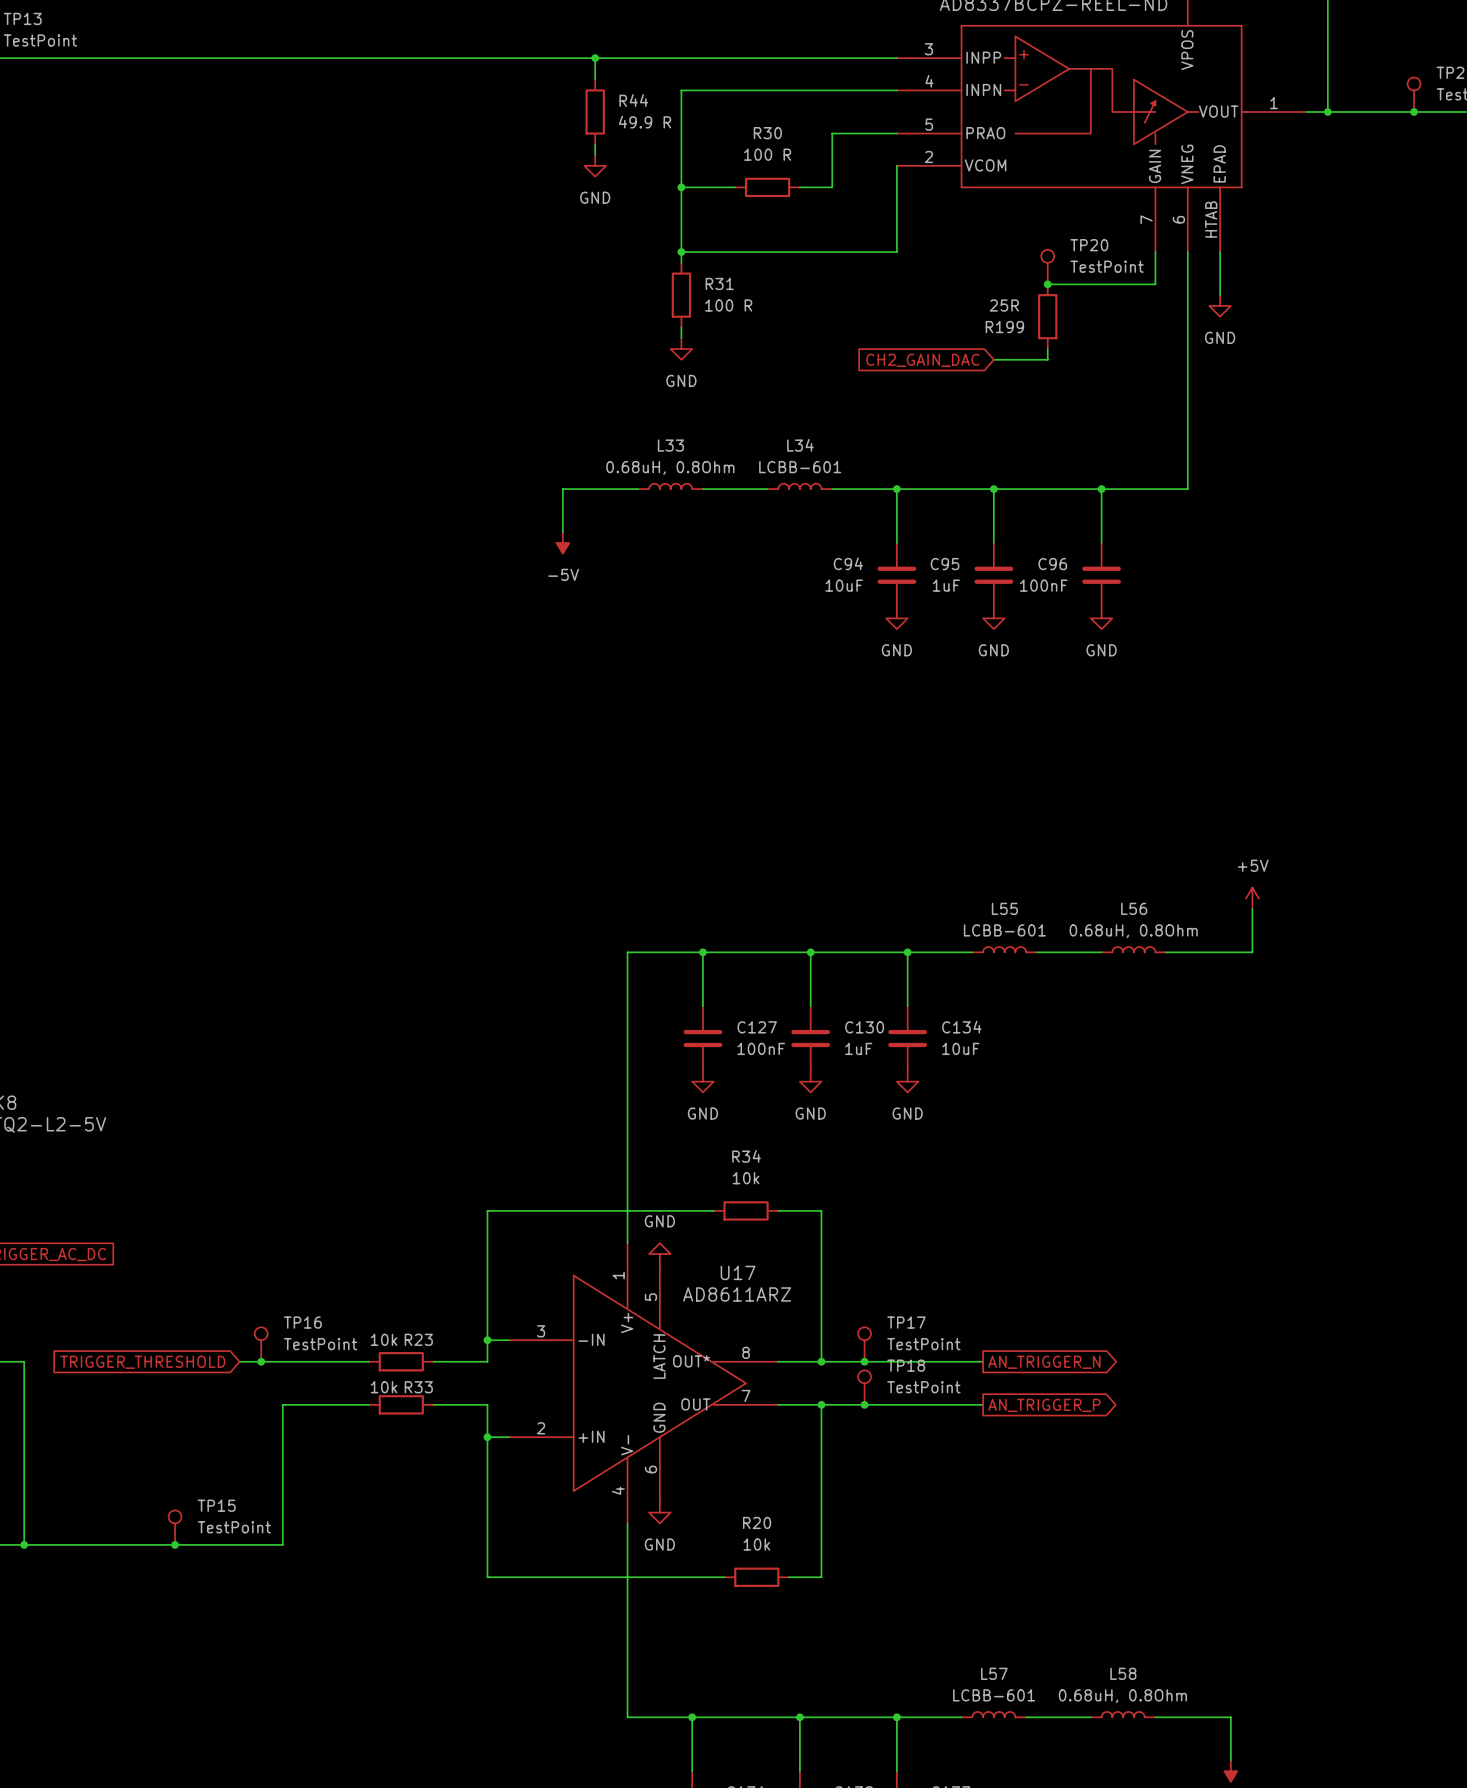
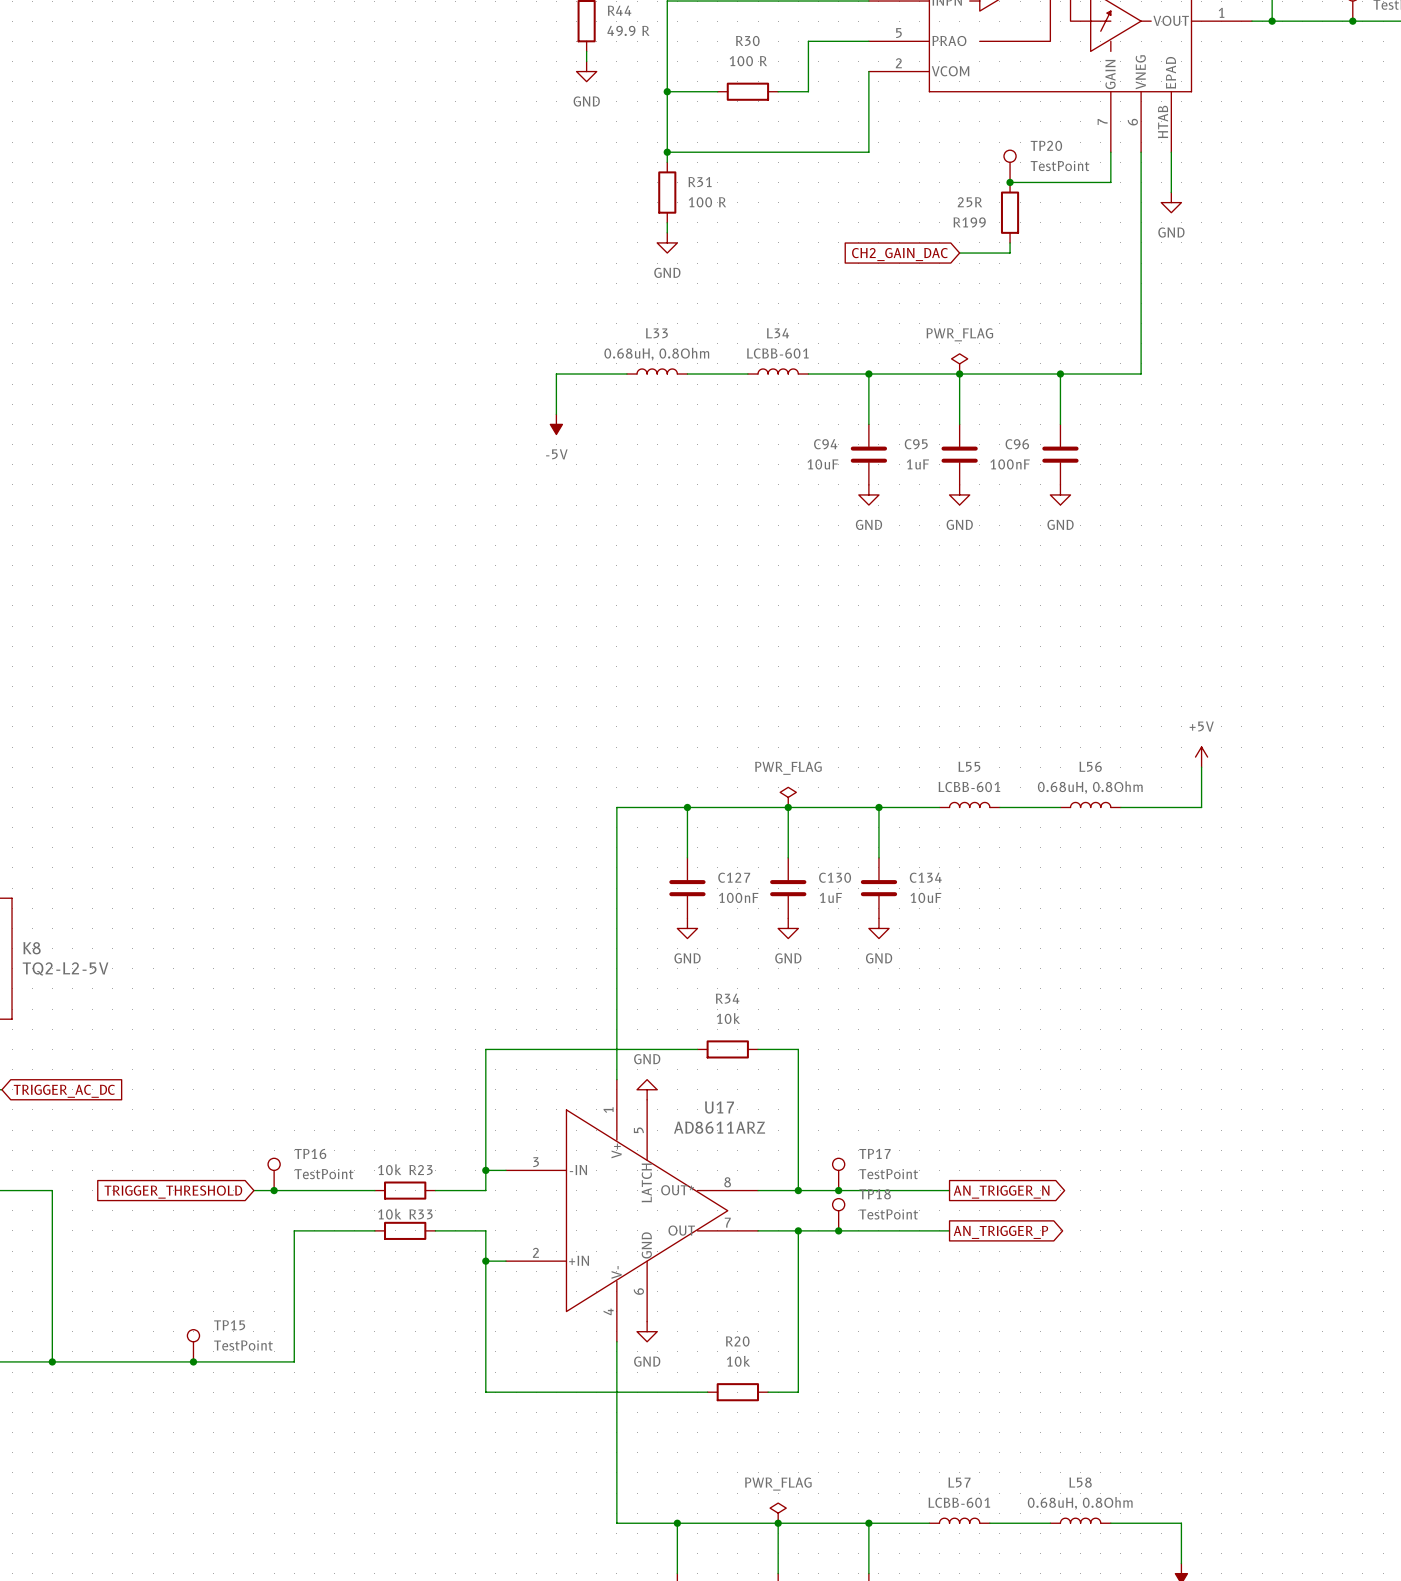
power symbol: none -> PWR_FLAG (959, 363)
power symbol: none -> PWR_FLAG (788, 797)
power symbol: none -> PWR_FLAG (778, 1513)

